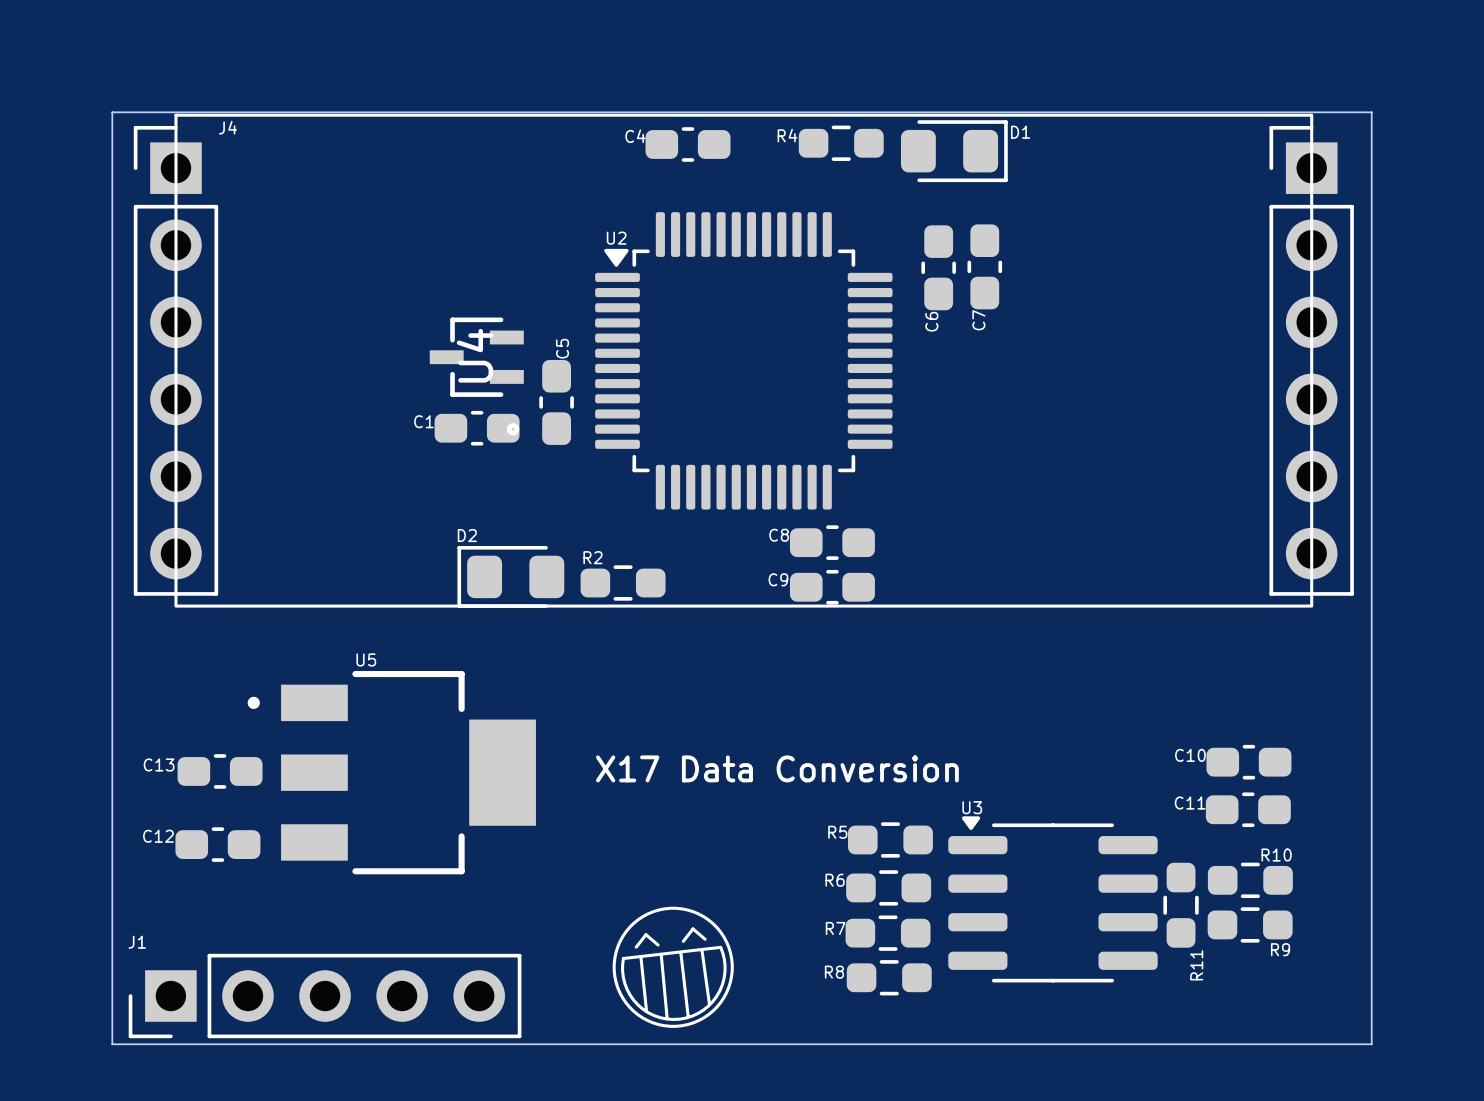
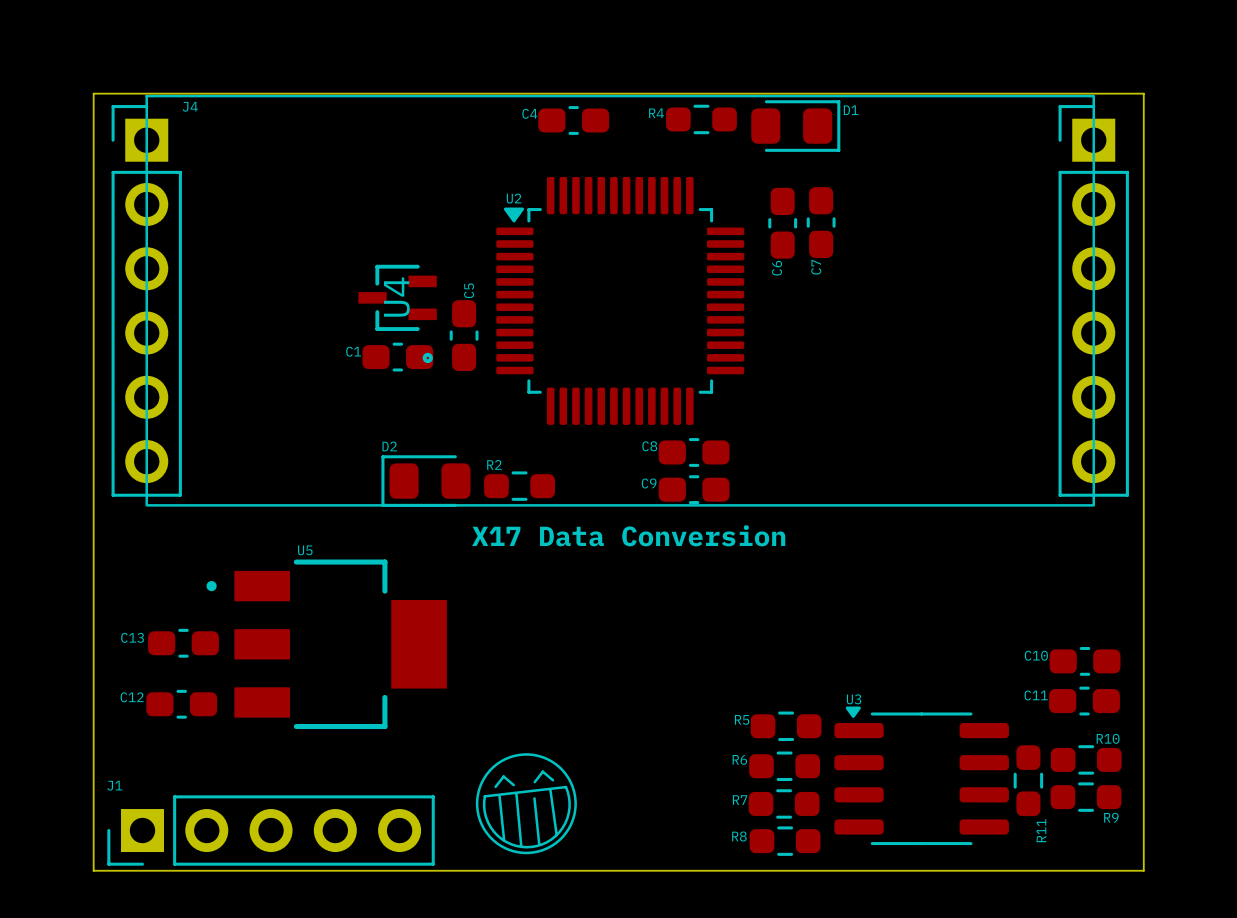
C10 position: (1248, 762) -> (1085, 661)
text position: X17 Data Conversion (777, 768) -> X17 Data Conversion (628, 535)
C11 position: (1248, 809) -> (1084, 701)
R5 position: (890, 839) -> (786, 726)
R10 position: (1250, 880) -> (1086, 759)
R6 position: (888, 887) -> (784, 766)
U3 position: (1052, 899) -> (921, 775)
R11 position: (1181, 905) -> (1028, 780)
R9 position: (1250, 924) -> (1086, 797)
R7 position: (888, 933) -> (784, 803)
line: (705, 939) (693, 928) (683, 941) -> (552, 780) (542, 771) (534, 782)
line: (658, 945) (645, 934) (636, 947) -> (513, 785) (503, 776) (495, 786)
line: (720, 947) (623, 958) (622, 971) (627, 989) (638, 1005) (654, 1015) (673, 1019) (692, 1016) (708, 1006) (719, 990) (724, 972) (724, 959) (720, 947) -> (565, 787) (484, 796) (484, 812) (488, 822) (497, 835) (510, 844) (526, 847) (542, 844) (559, 832) (567, 818) (569, 802) (565, 787)
line: (701, 950) (709, 1004) -> (550, 789) (556, 834)
line: (680, 952) (688, 1016) -> none
line: none -> (499, 795) (504, 840)
line: (661, 955) (667, 1017) -> (516, 793) (521, 845)
drawing position: (673, 967) -> (526, 803)
R8 position: (889, 977) -> (785, 841)

